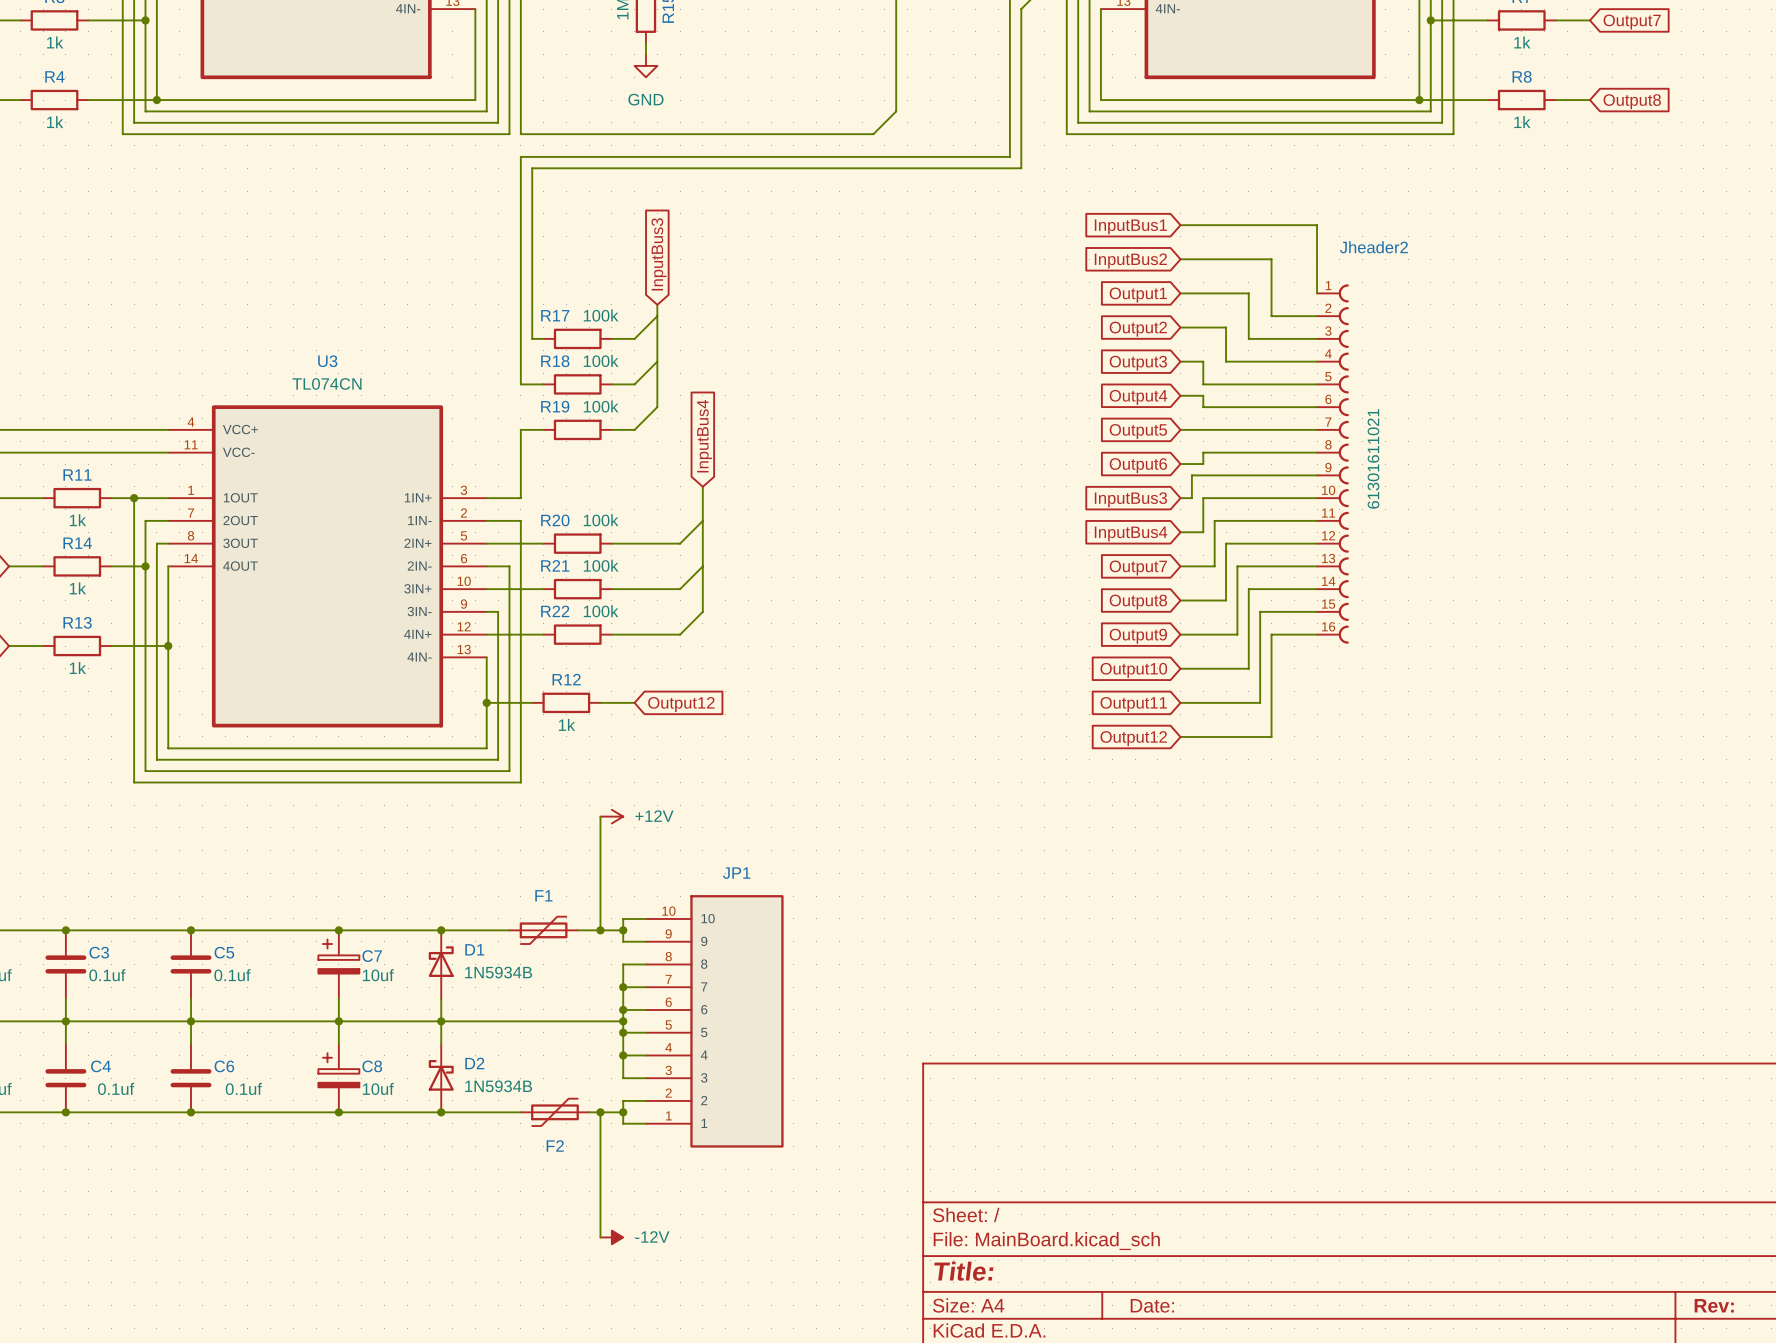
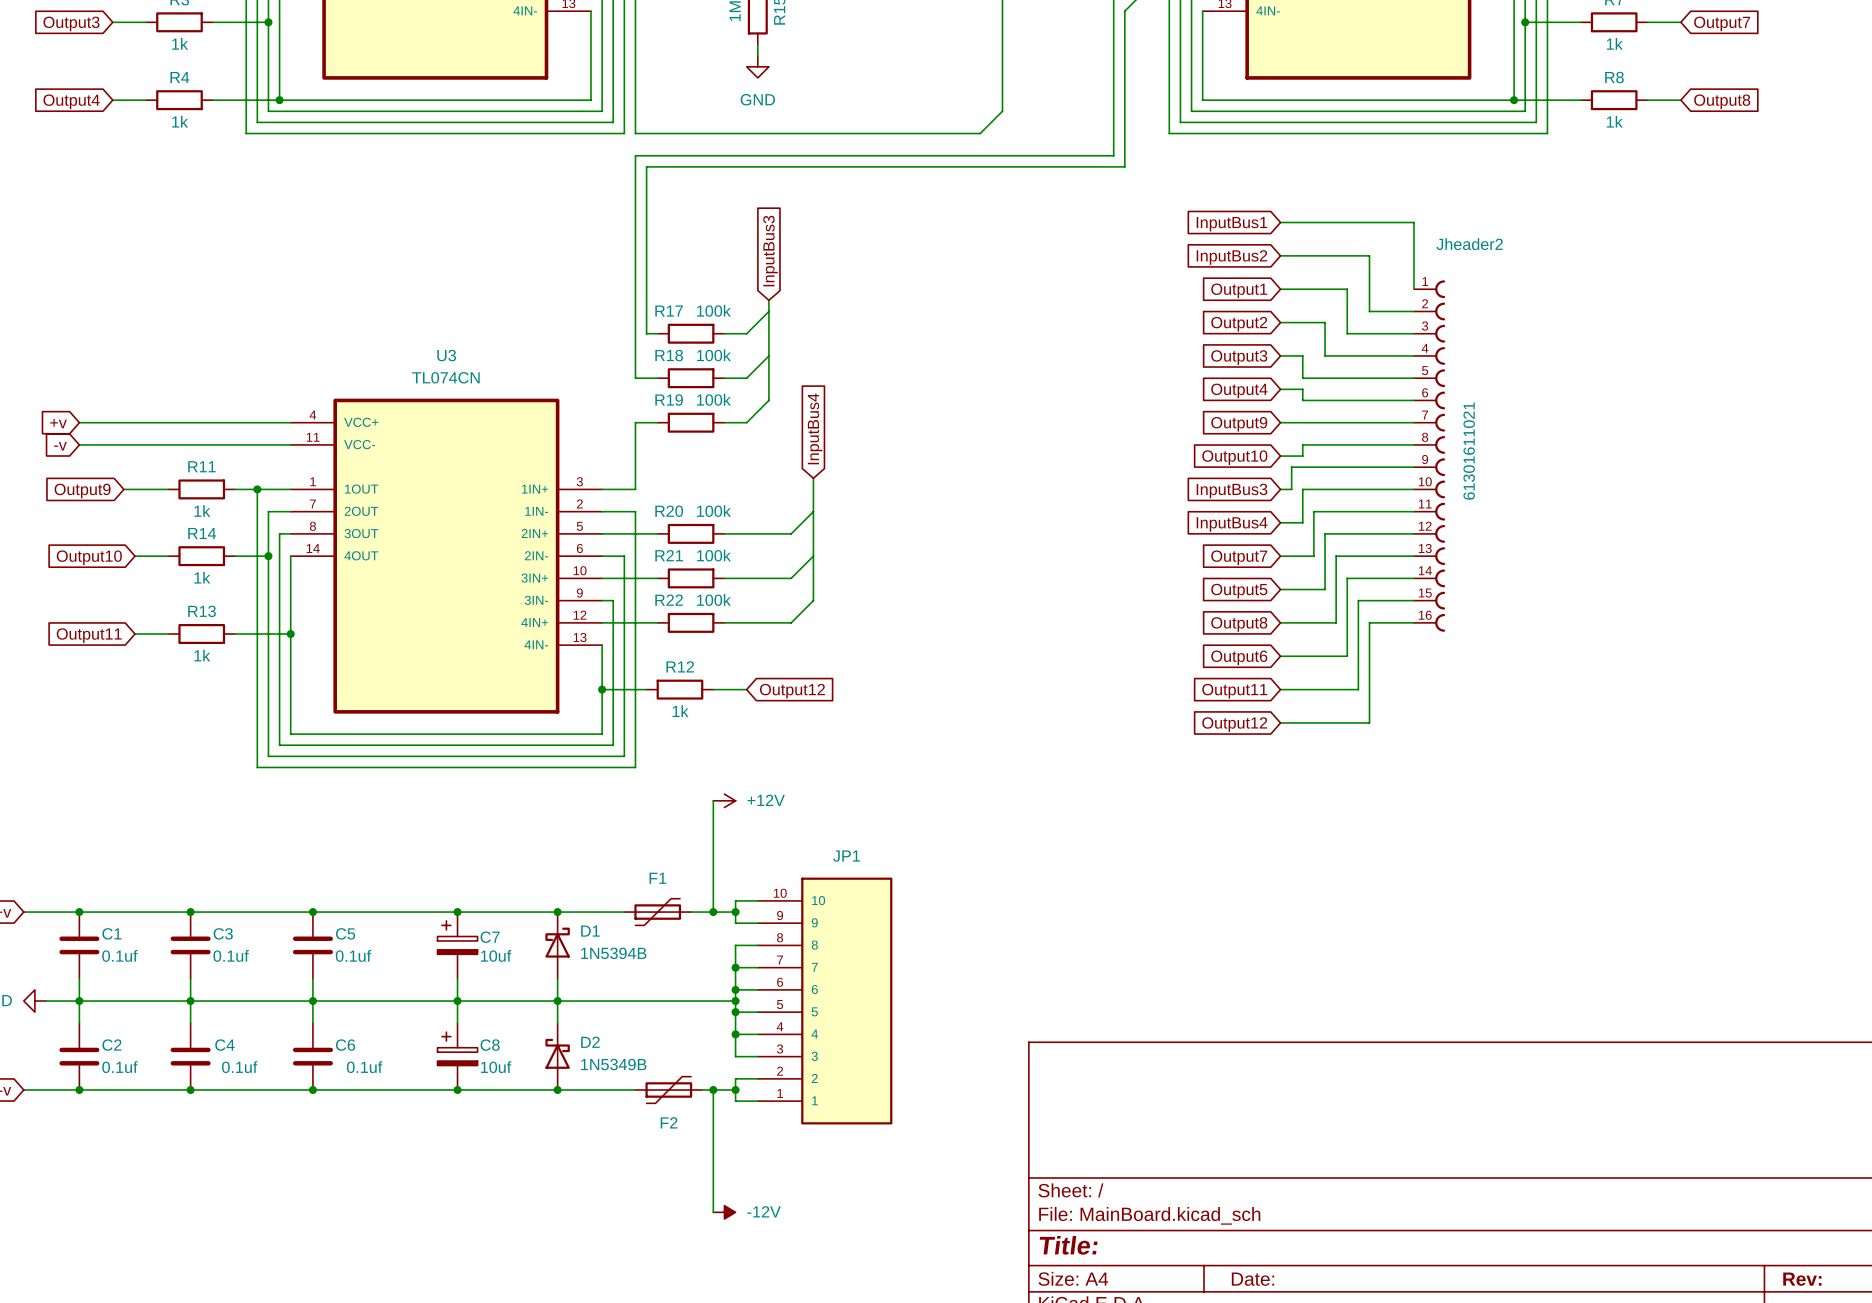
global label: Output5 (1138, 431) -> Output9 (1239, 424)
global label: Output6 (1138, 465) -> Output10 (1234, 457)
global label: Output8 (1138, 602) -> Output5 (1239, 591)
global label: Output9 (1138, 636) -> Output8 (1239, 624)
global label: Output10 (1133, 670) -> Output6 (1239, 657)
D1 value: 1N5934B (498, 972) -> 1N5394B (613, 953)
D2 value: 1N5934B (498, 1086) -> 1N5349B (613, 1064)

